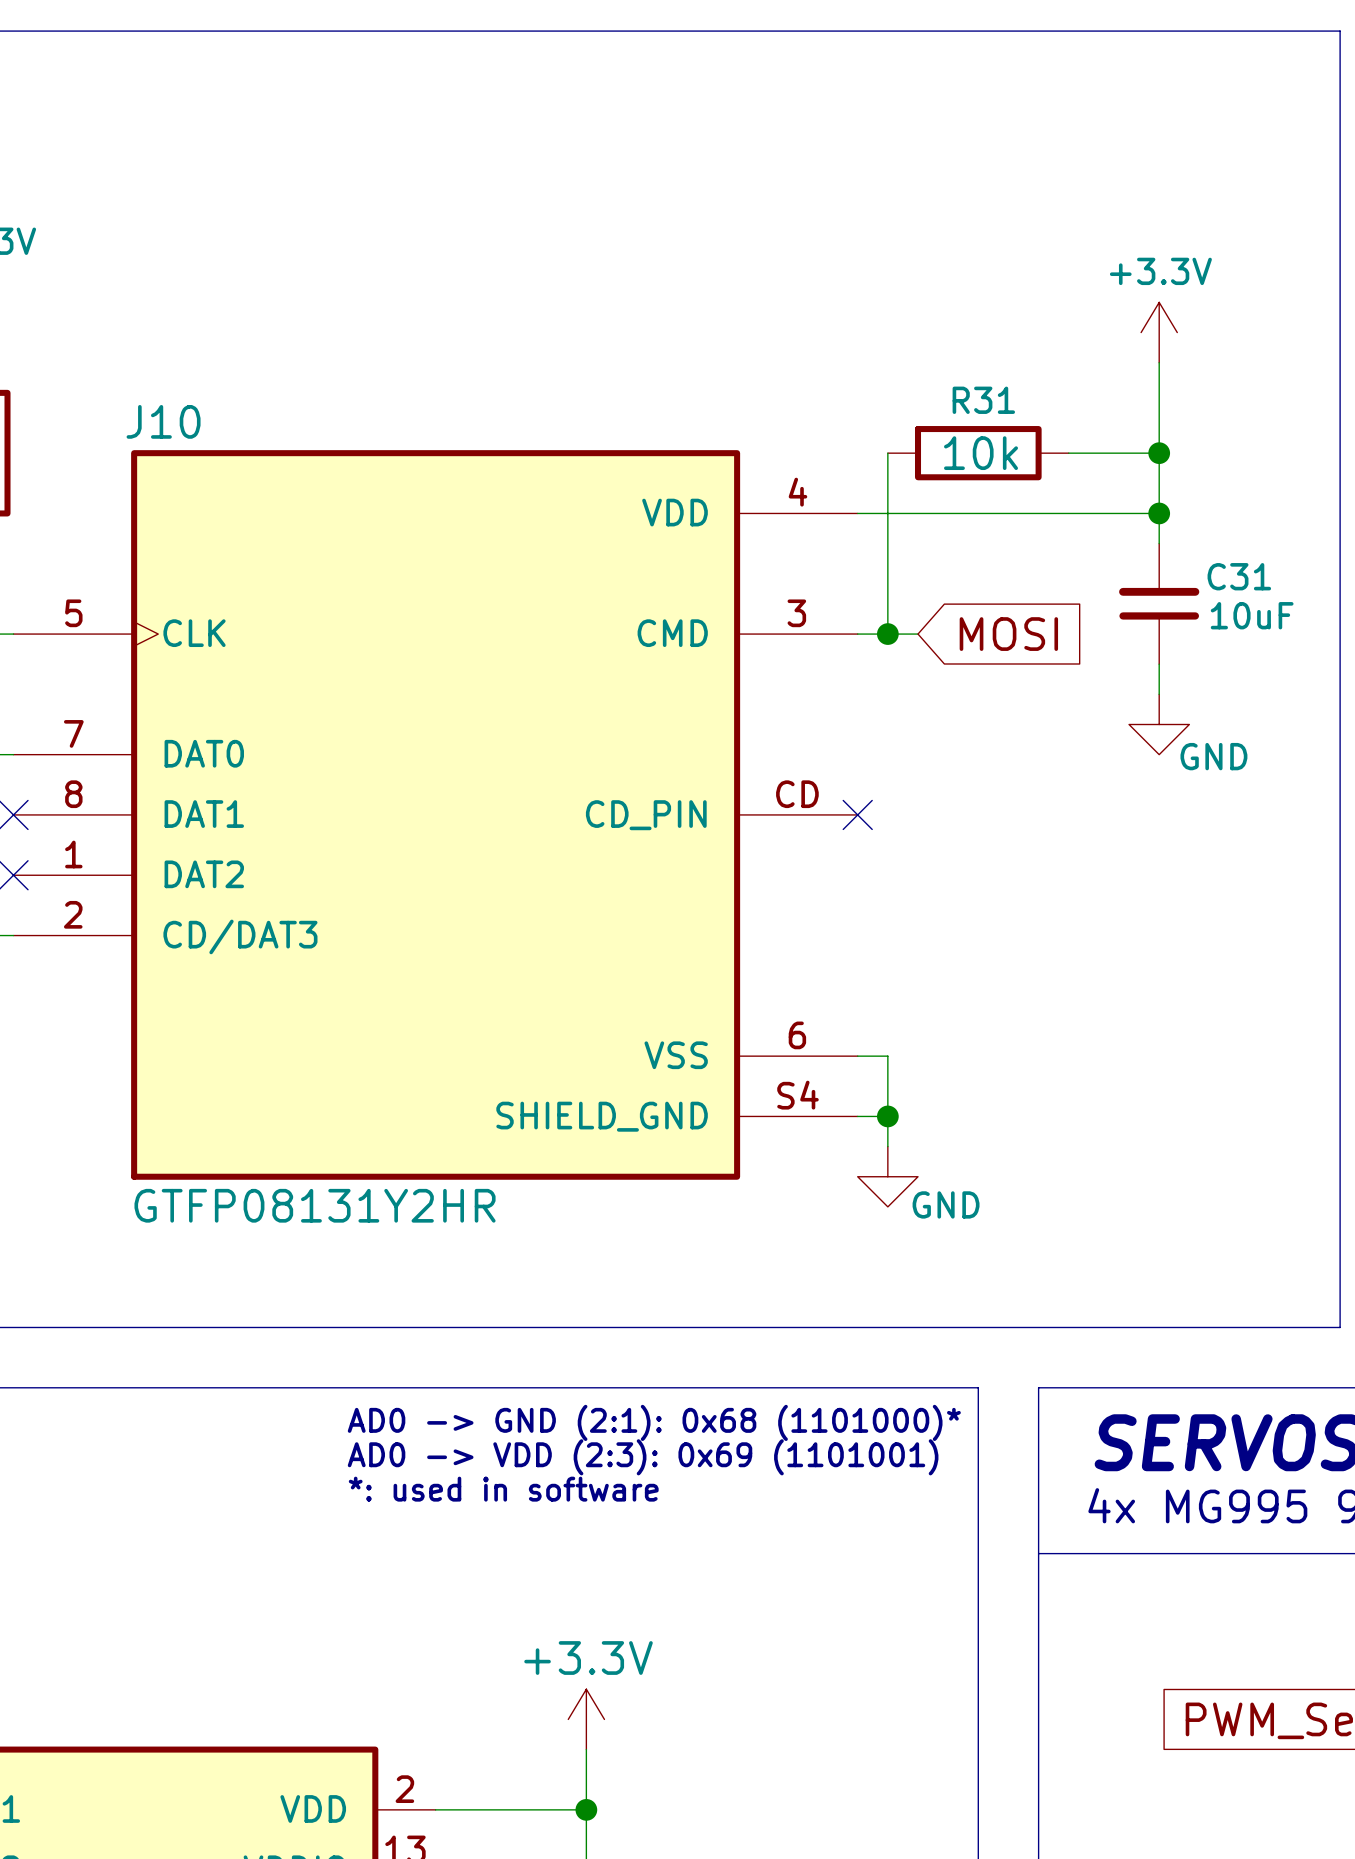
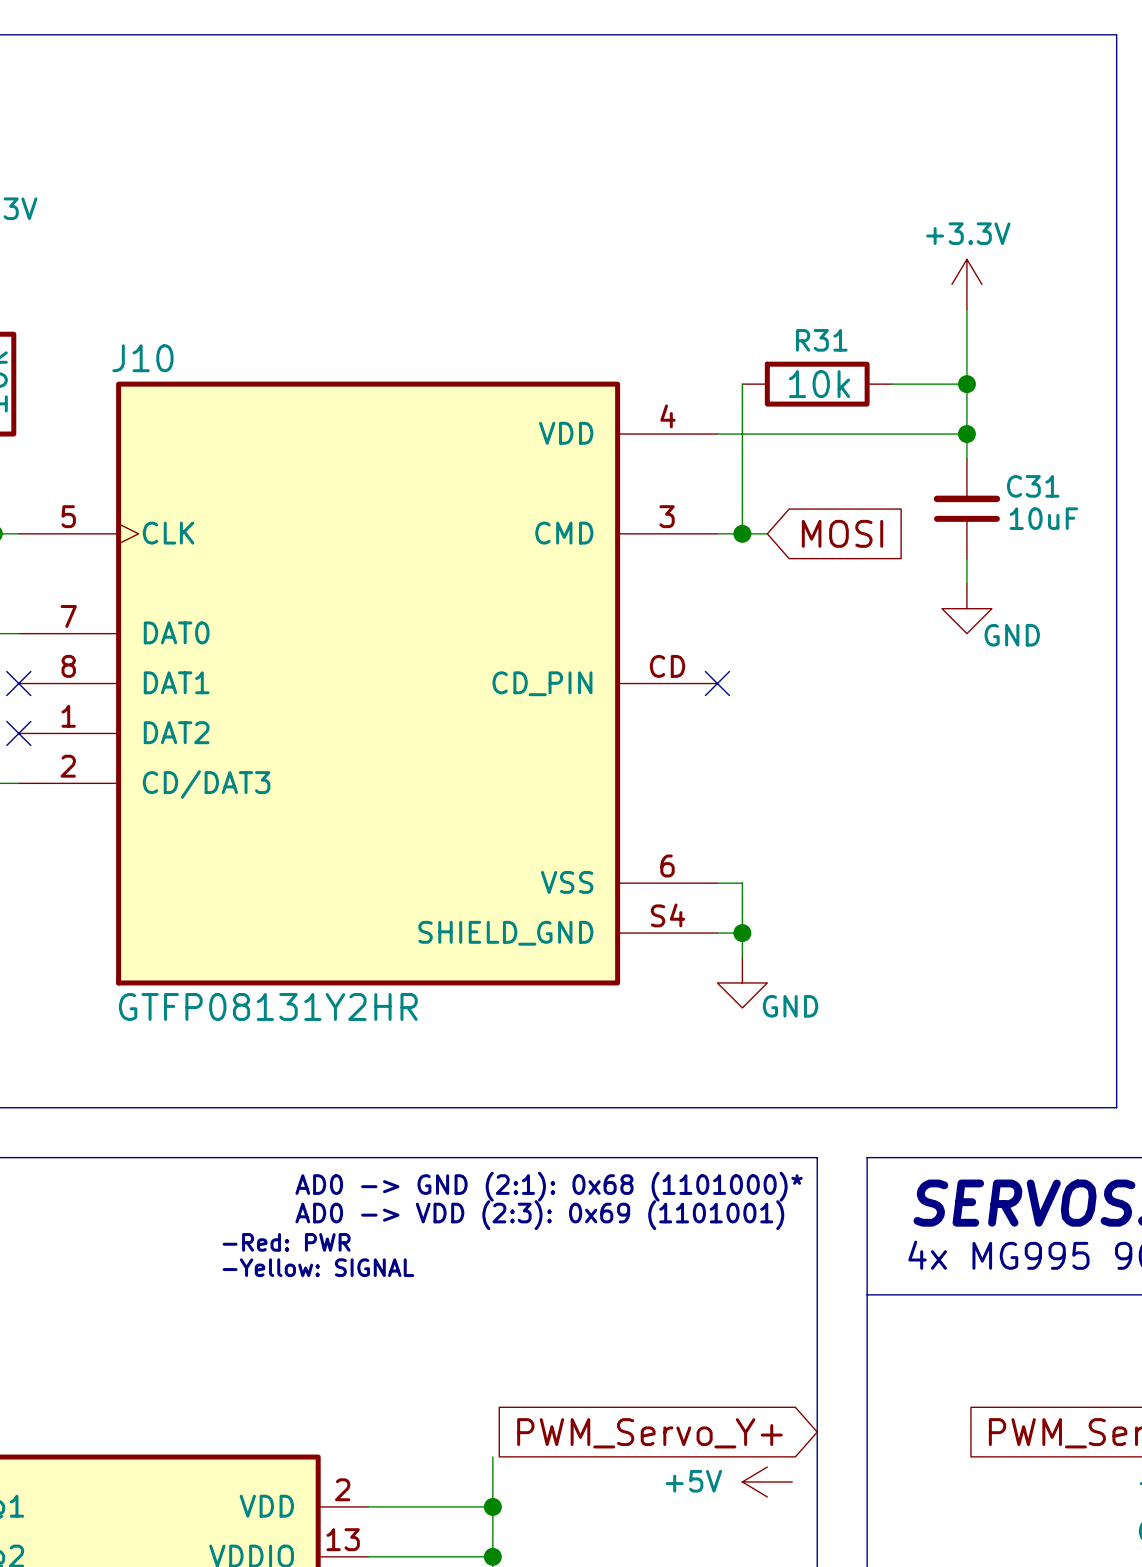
text: *: used in software (503, 1489) -> none
text: none -> -Red: PWR (286, 1242)
text: none -> -Yellow: SIGNAL (318, 1267)
power symbol: +3.3V (586, 1719) -> none
global label: none -> PWM_Servo_Y+ (649, 1433)
power symbol: none -> +5V (767, 1481)

